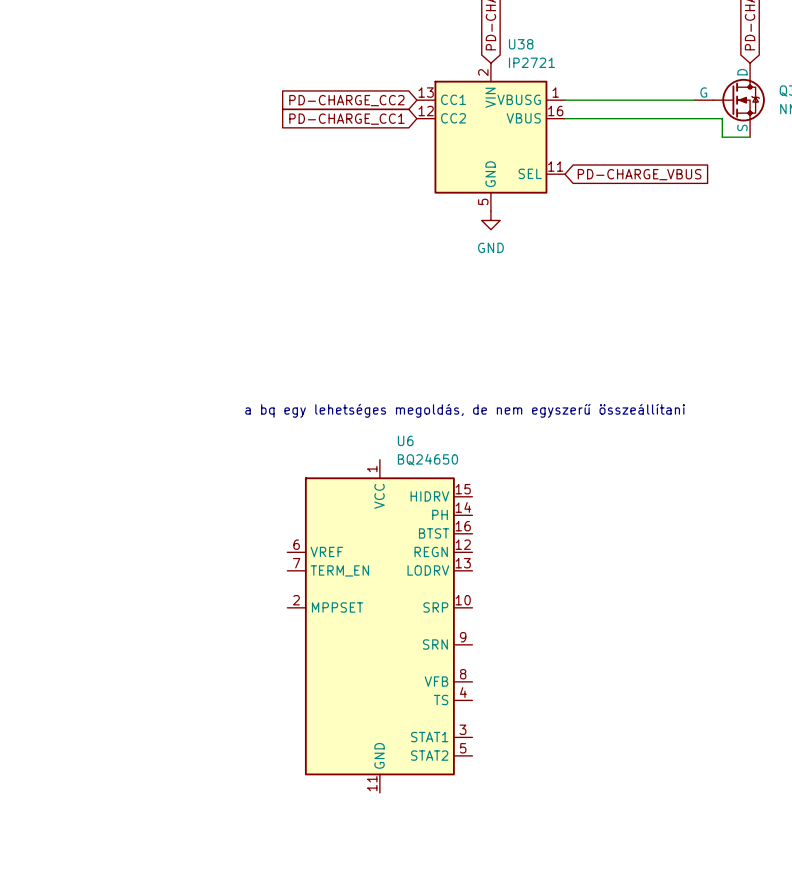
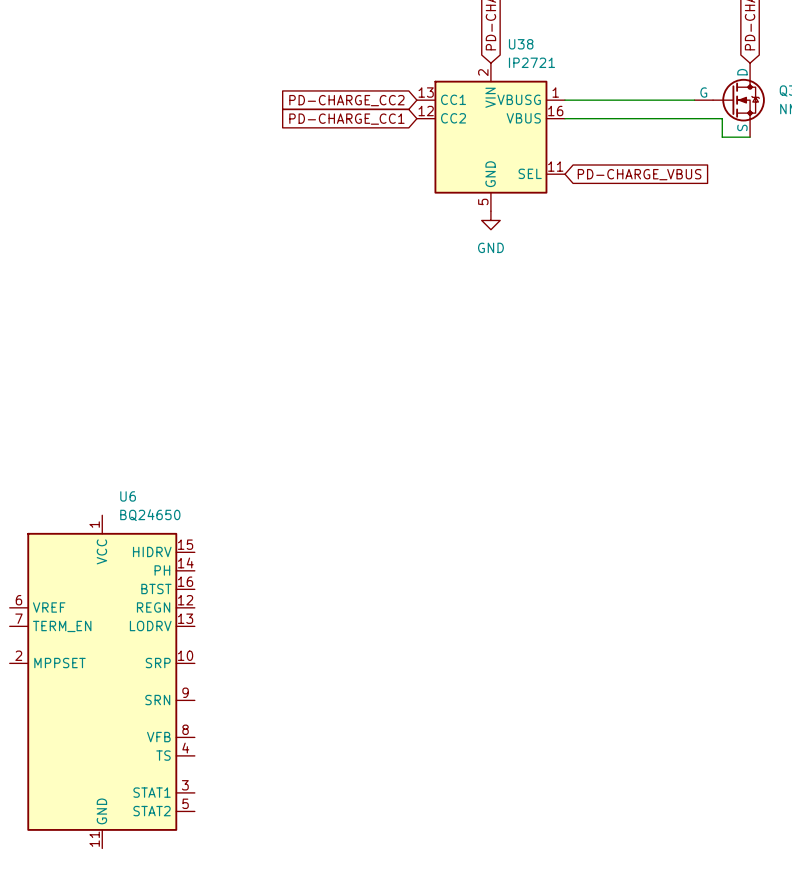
text: a bq egy lehetséges megoldás, de nem egyszerű összeállítani (465, 410) -> none
U6 position: (379, 626) -> (102, 681)

